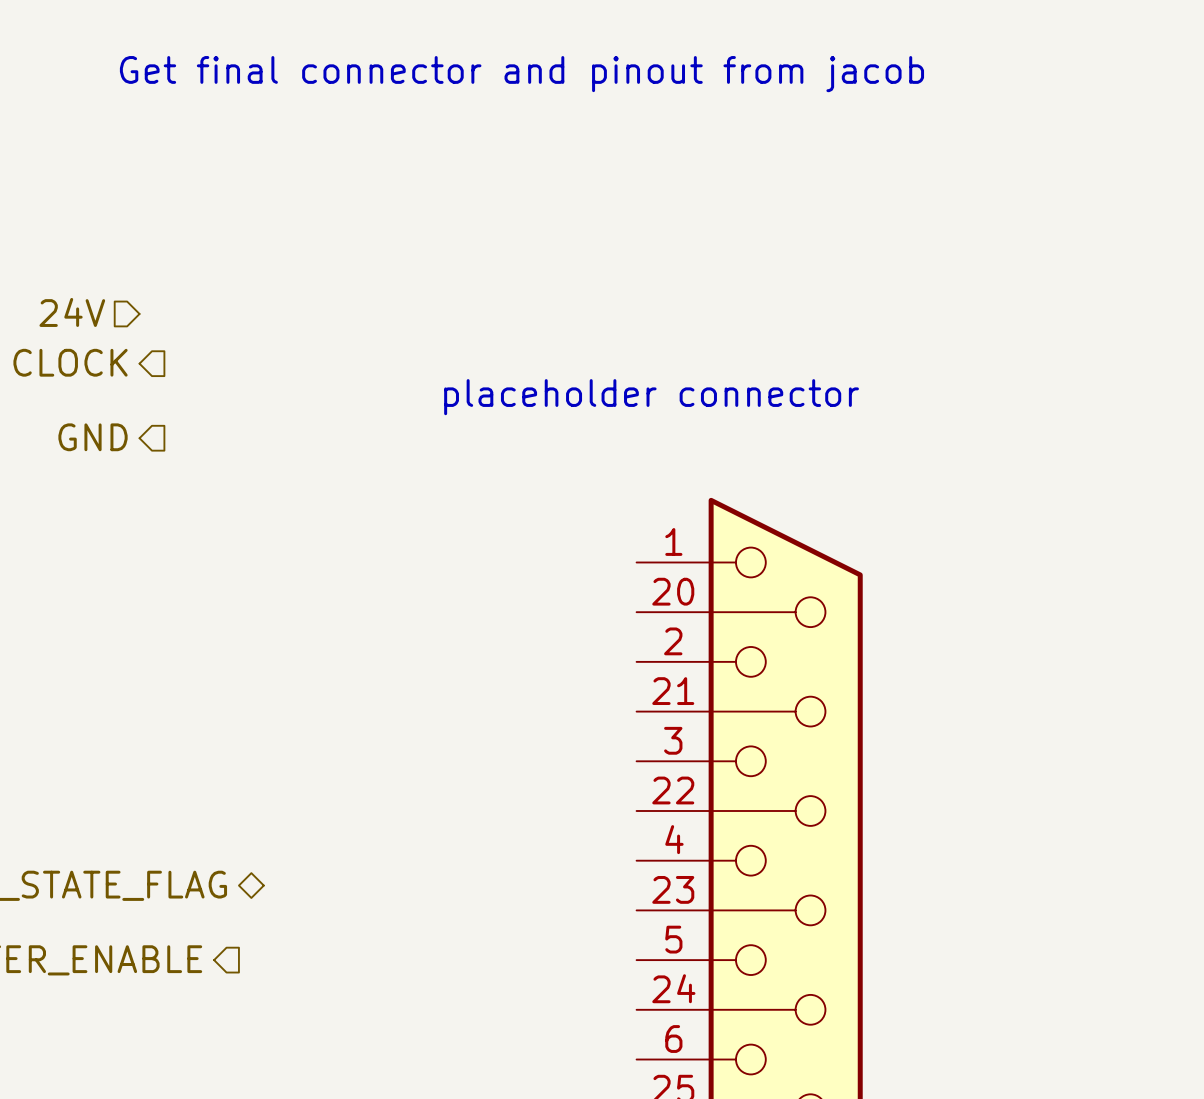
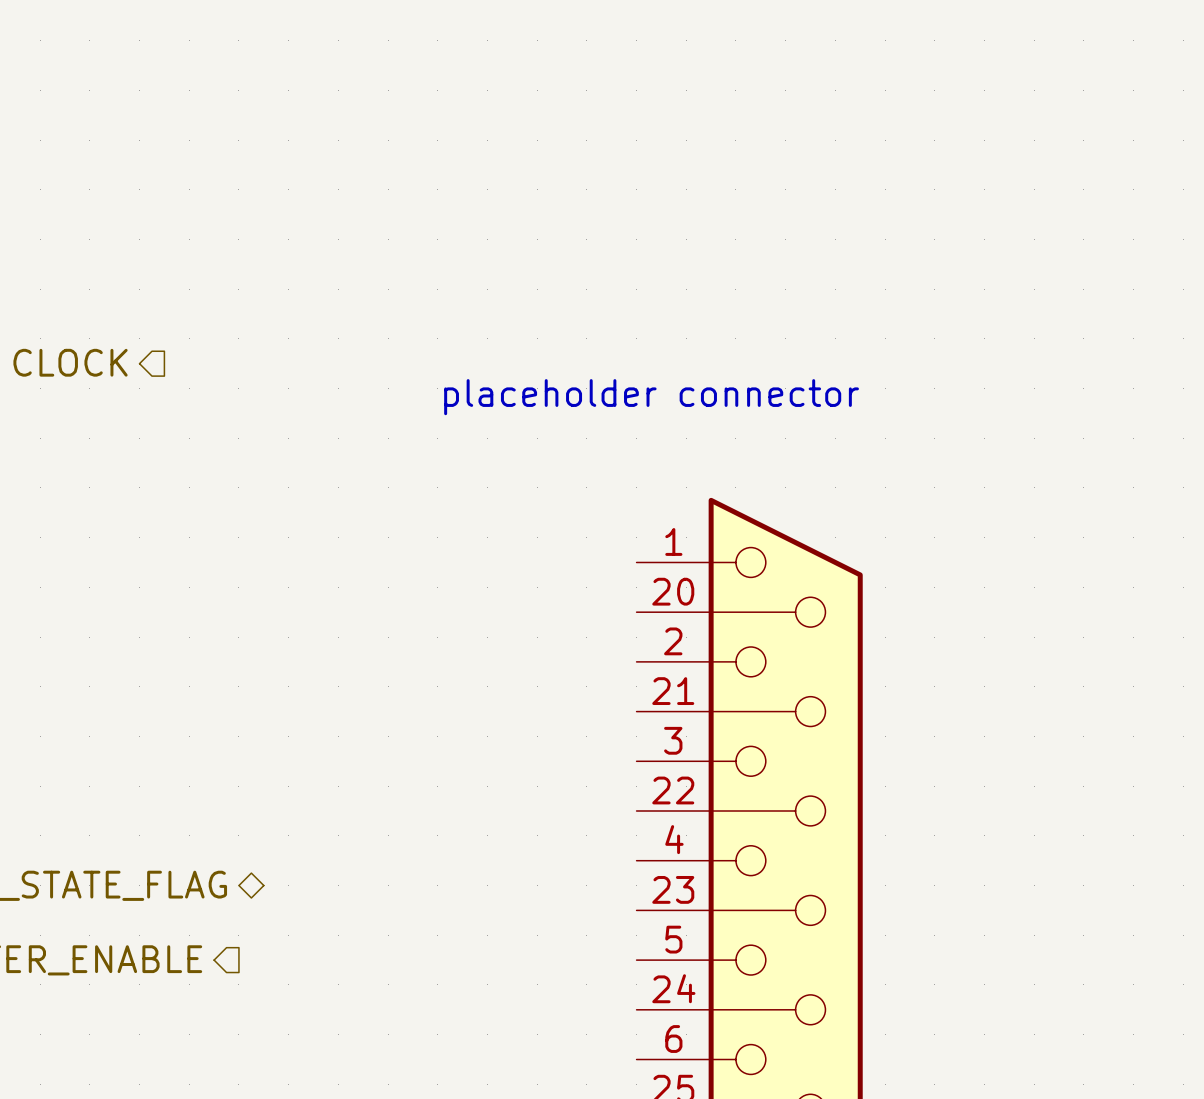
text: Get final connector and pinout from jacob (521, 74) -> none
hierarchical label: 24V (72, 312) -> none
hierarchical label: GND (93, 437) -> none

